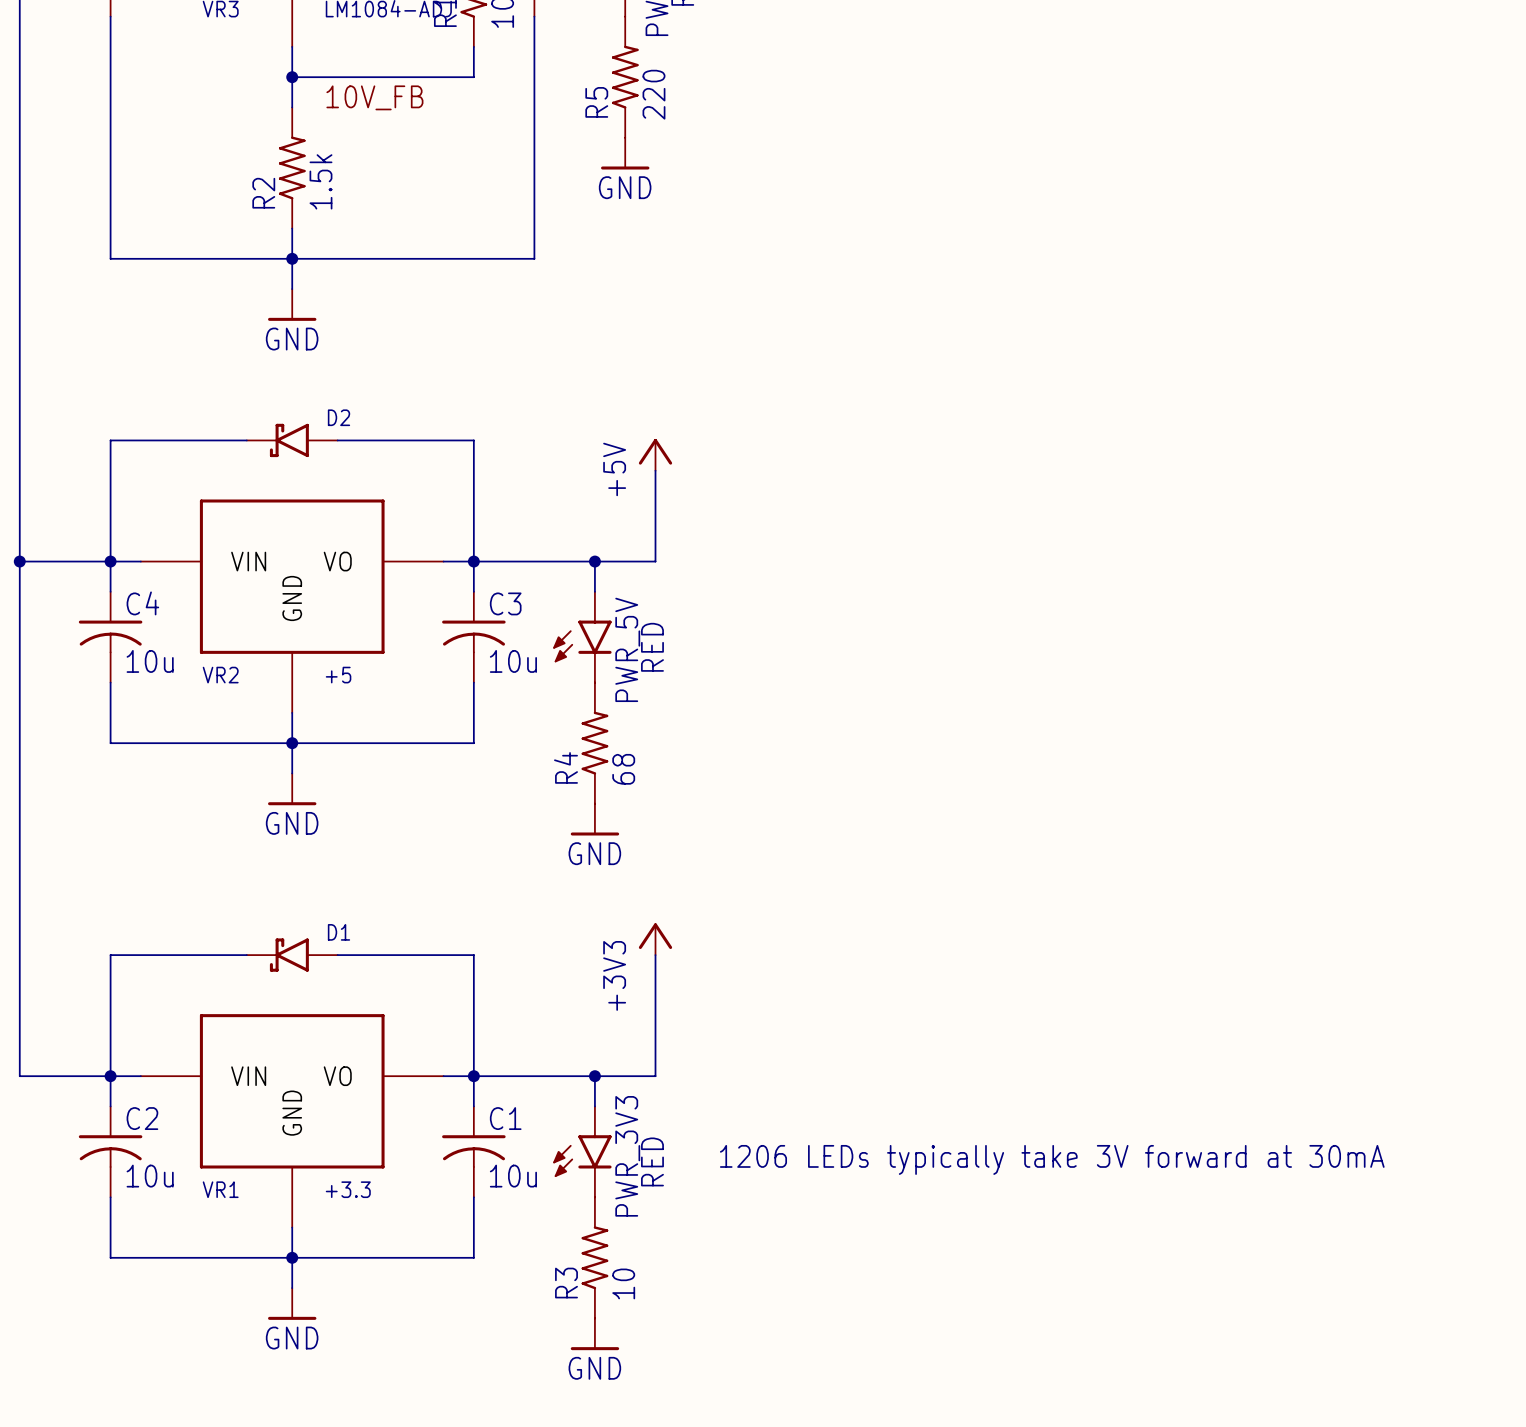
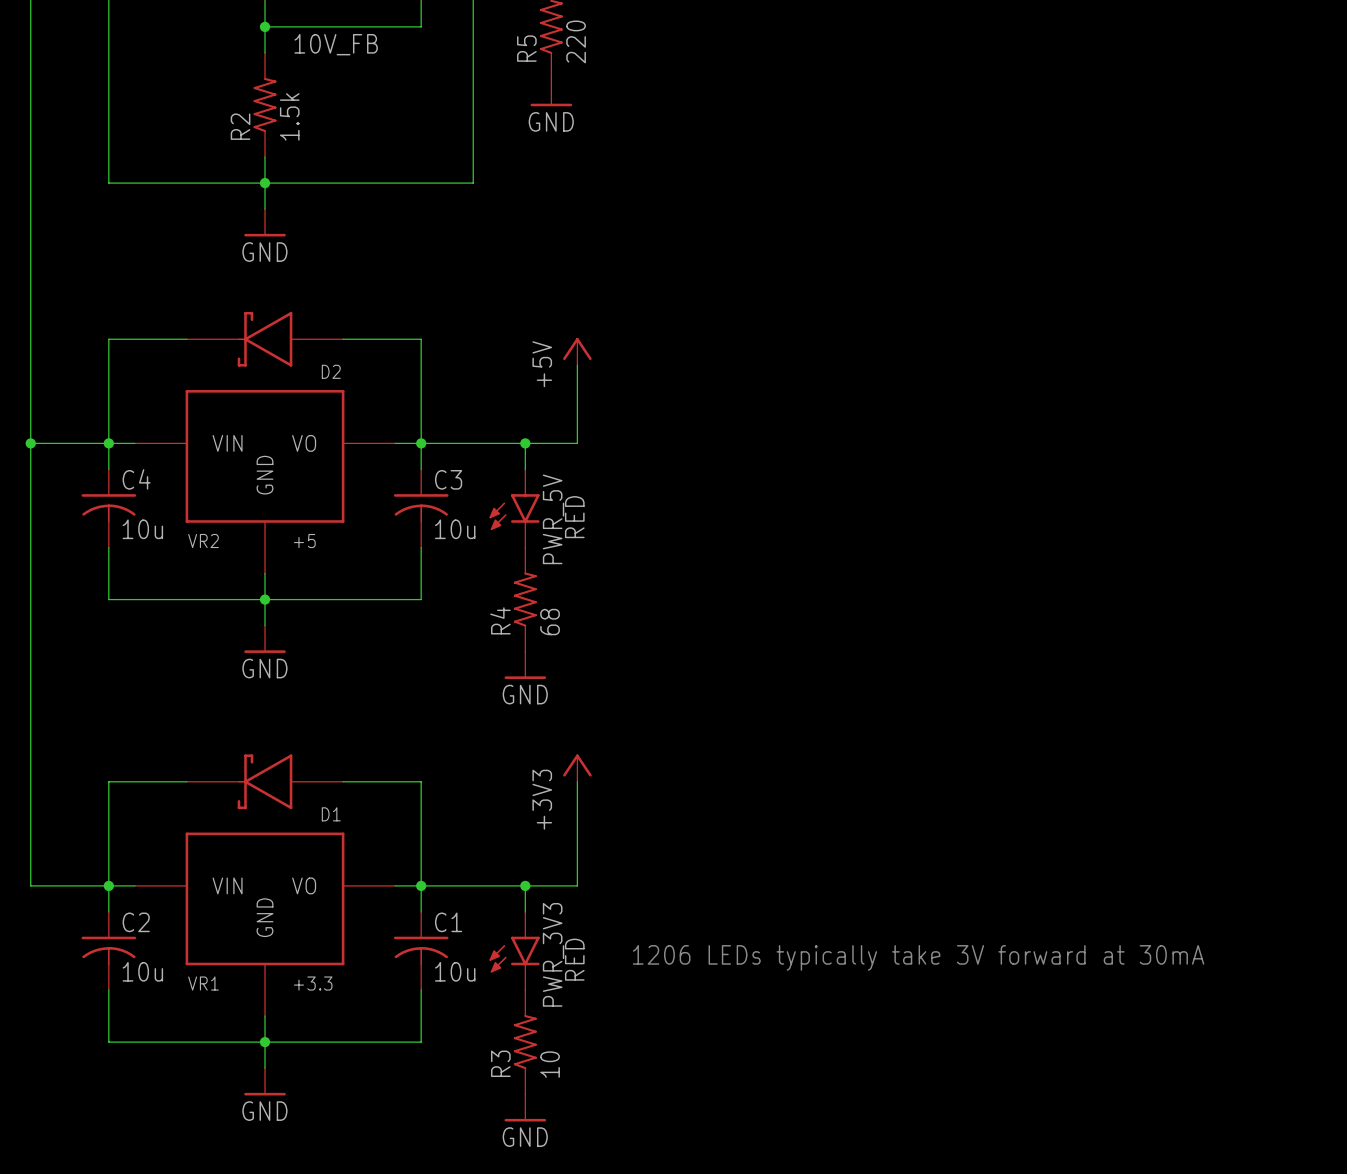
D2 name position: D2 (339, 417) -> D2 (331, 371)
D2 symbol: [246, 423, 338, 458] -> [186, 311, 344, 367]
D1 name position: D1 (339, 932) -> D1 (331, 814)
D1 symbol: [246, 938, 338, 972] -> [186, 754, 344, 810]

